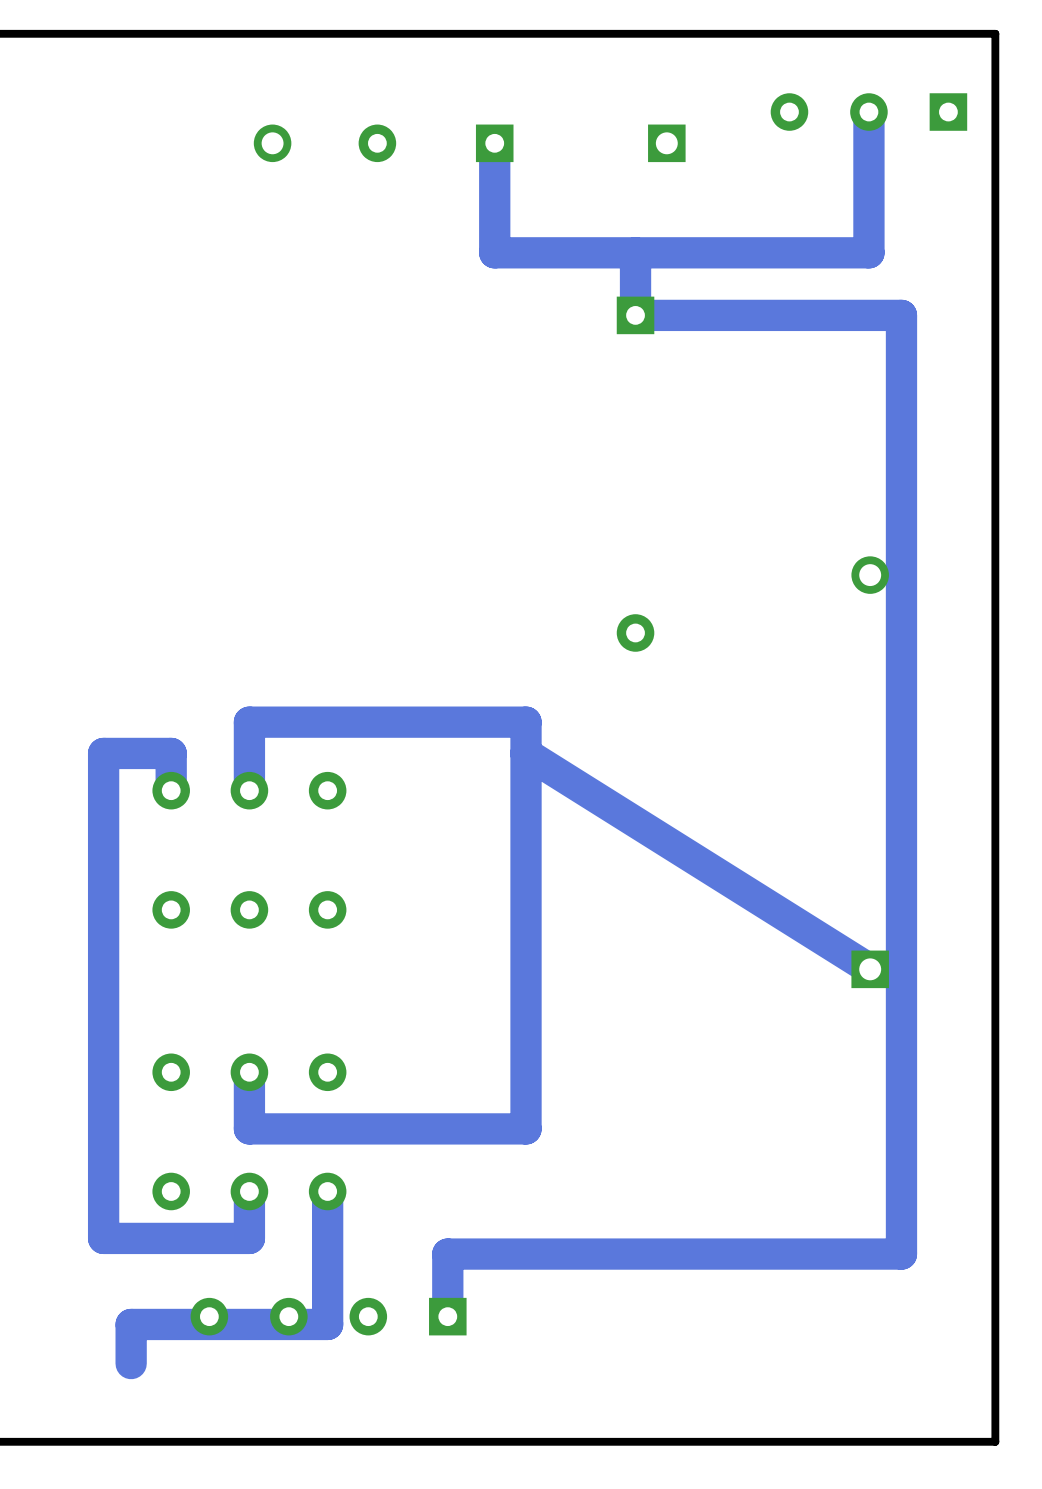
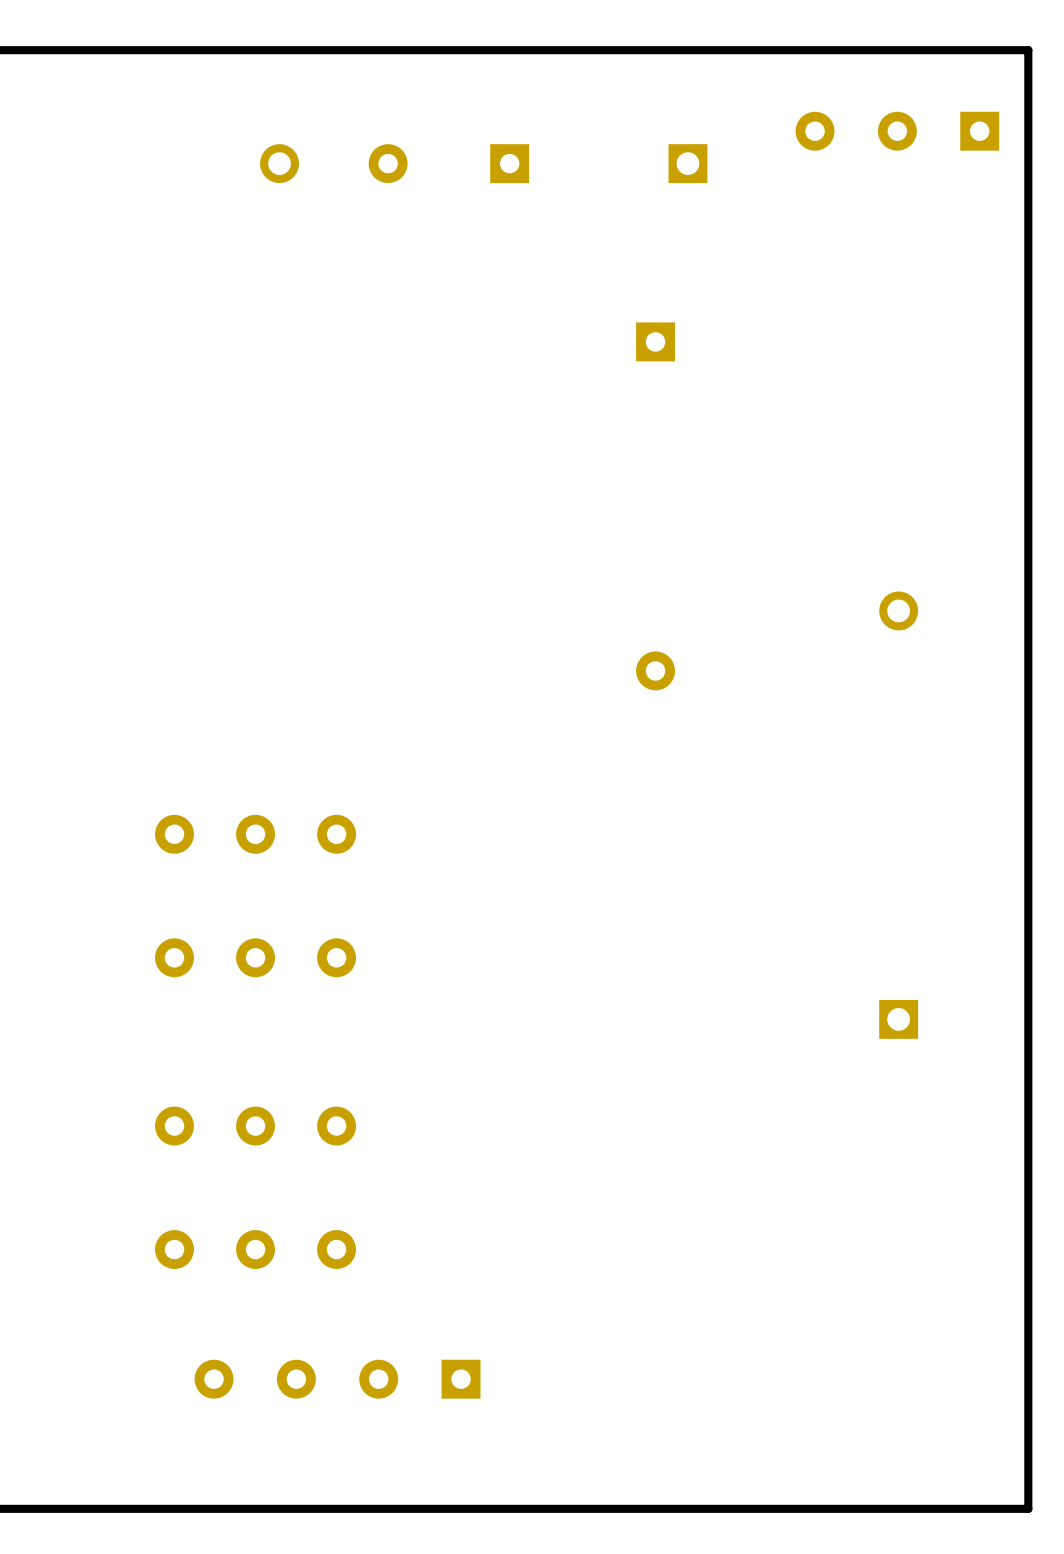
track: (868, 112) (868, 252) (494, 252) (494, 143) -> none
track: (635, 252) (635, 315) (901, 315) (901, 1254) (447, 1254) (447, 1316) -> none
track: (526, 753) (870, 969) -> none
track: (171, 790) (171, 753) (103, 753) (103, 1238) (249, 1238) (249, 1191) -> none
track: (249, 790) (249, 722) (526, 722) (526, 1128) (249, 1128) (249, 1072) -> none
track: (327, 1191) (327, 1324) (131, 1324) (131, 1363) -> none

